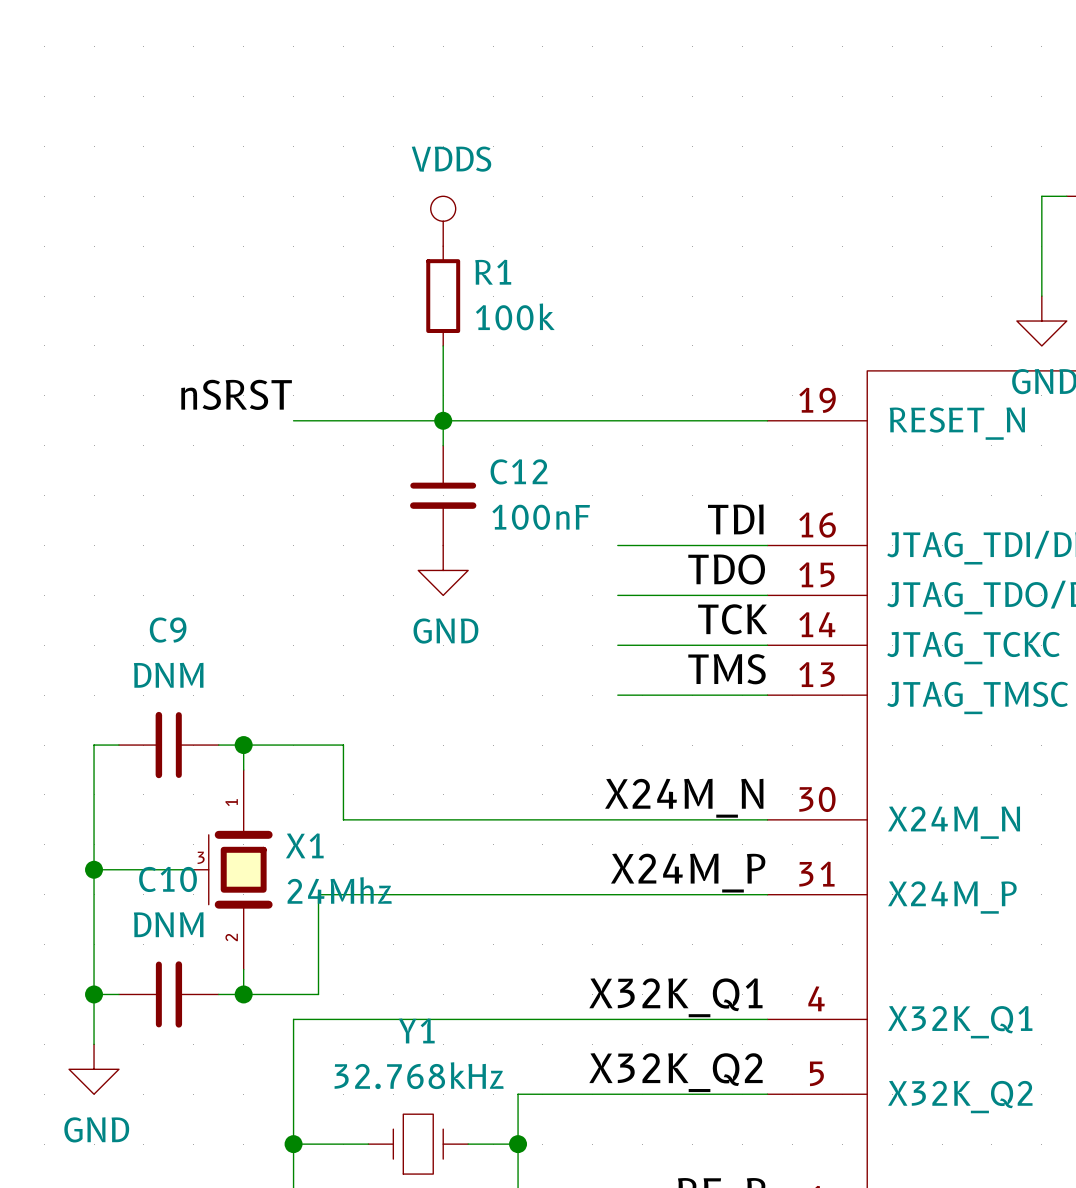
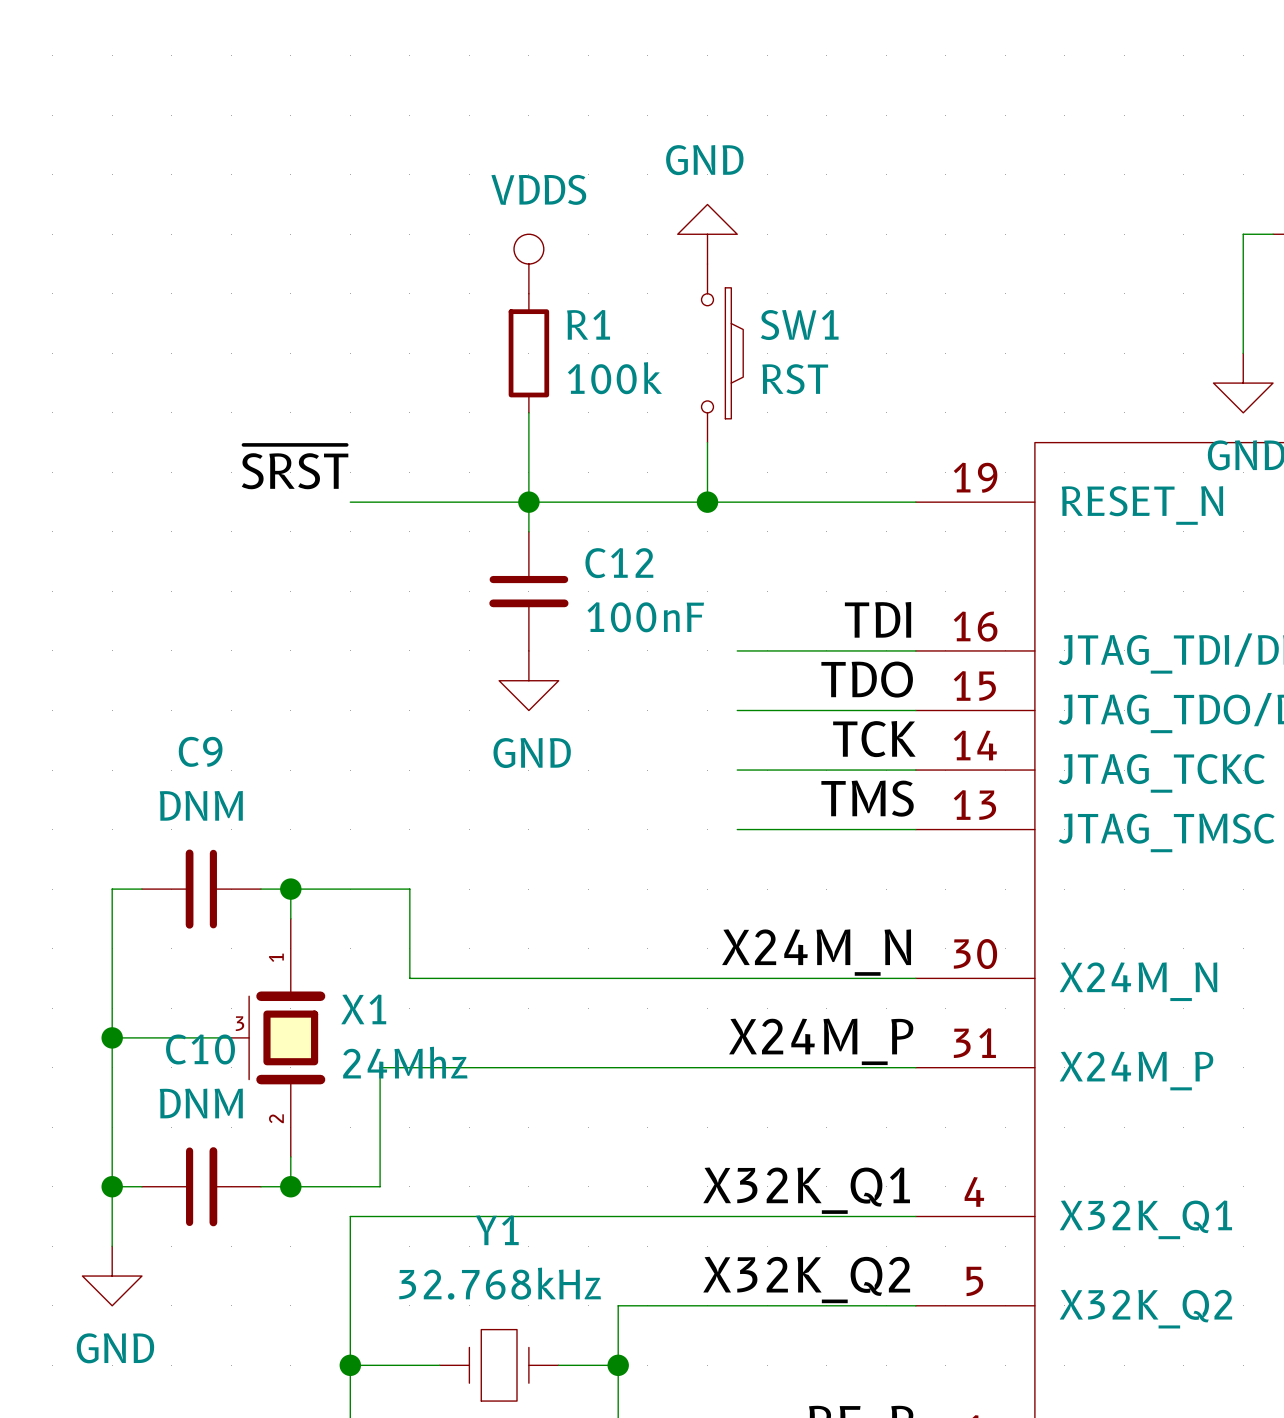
power symbol: none -> GND (707, 234)
SW1: none -> RST (722, 353)
wire: none -> (707, 442) (707, 502)
label: nSRST (236, 394) -> ~{SRST} (295, 467)
junction: none -> (707, 502)

